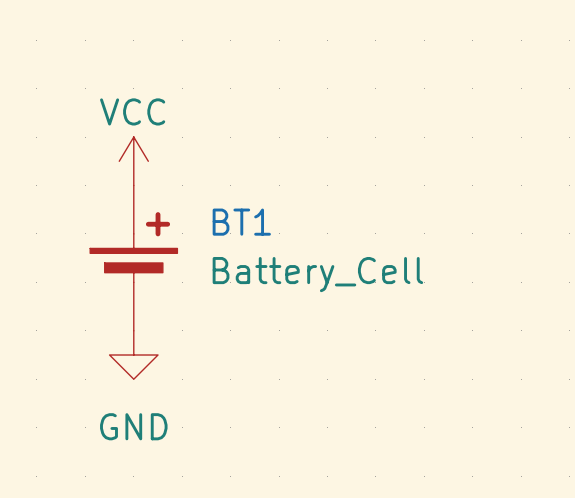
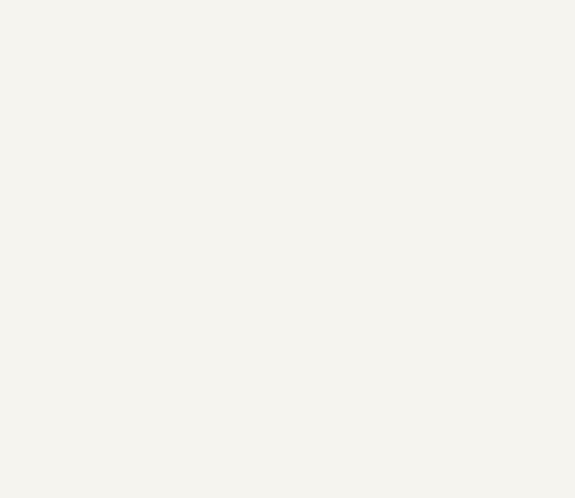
power symbol: VCC (133, 161) -> none
BT1: Battery_Cell (133, 258) -> none
power symbol: GND (133, 355) -> none

